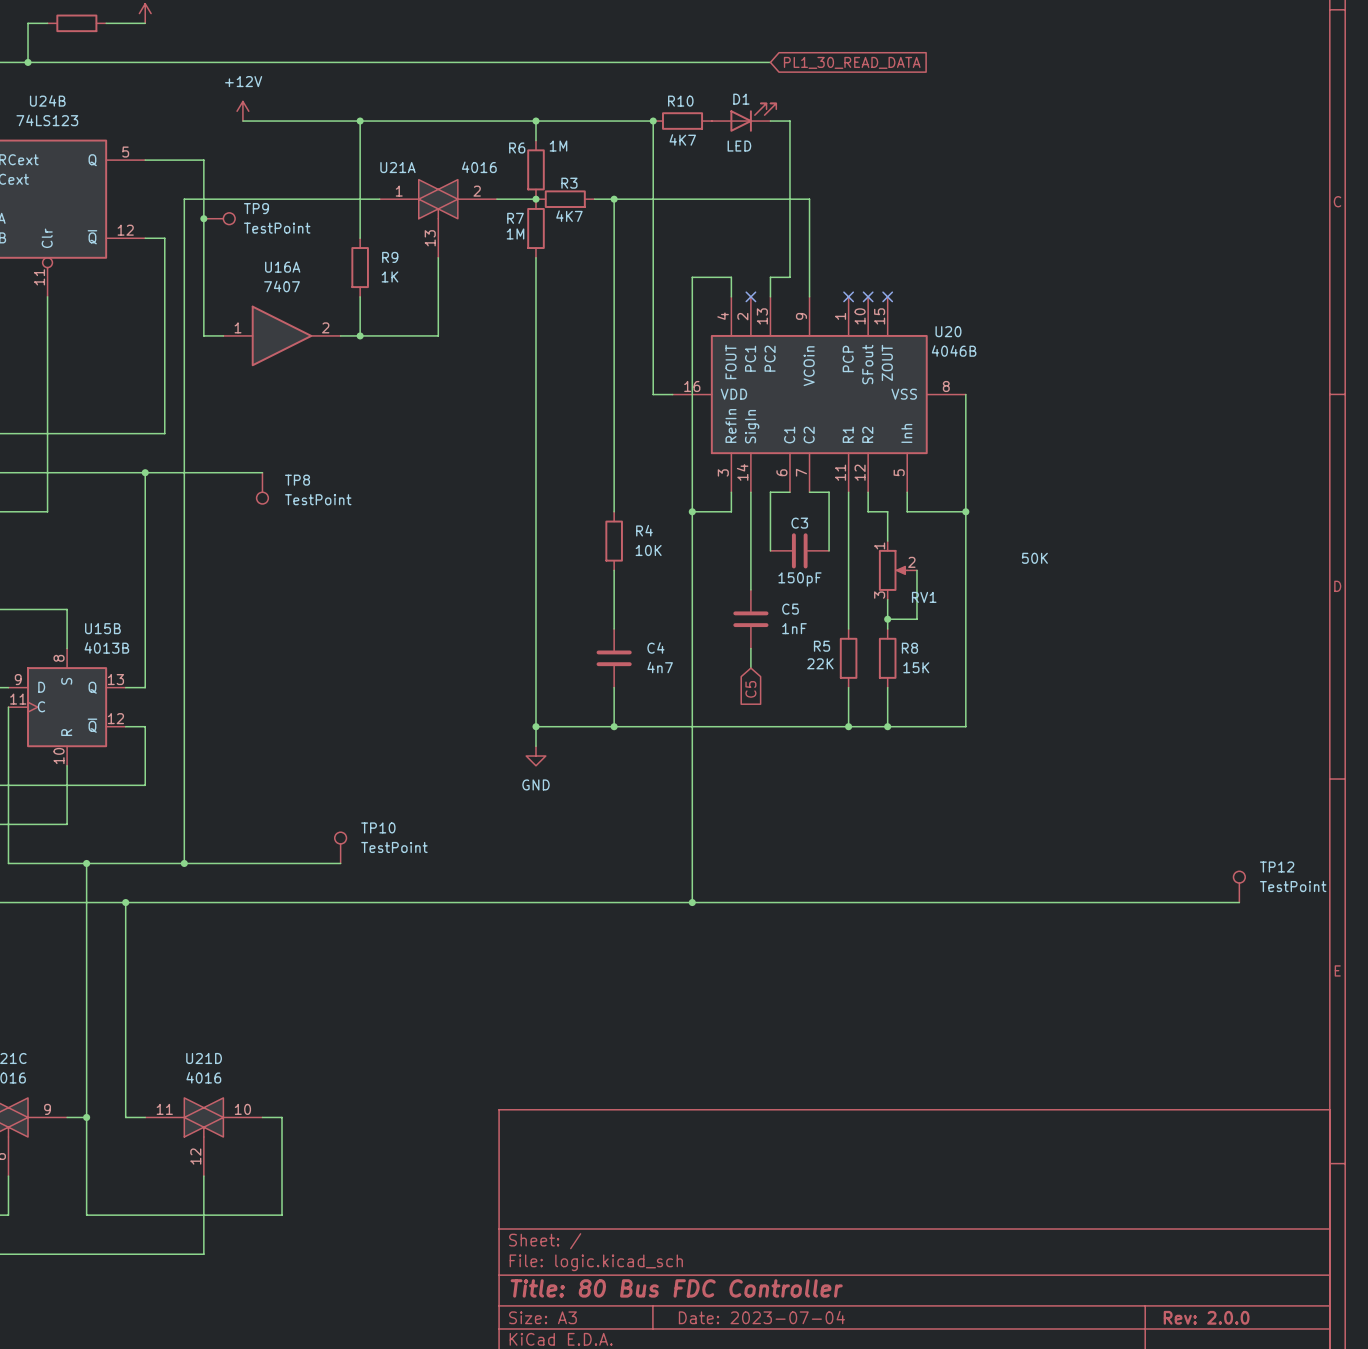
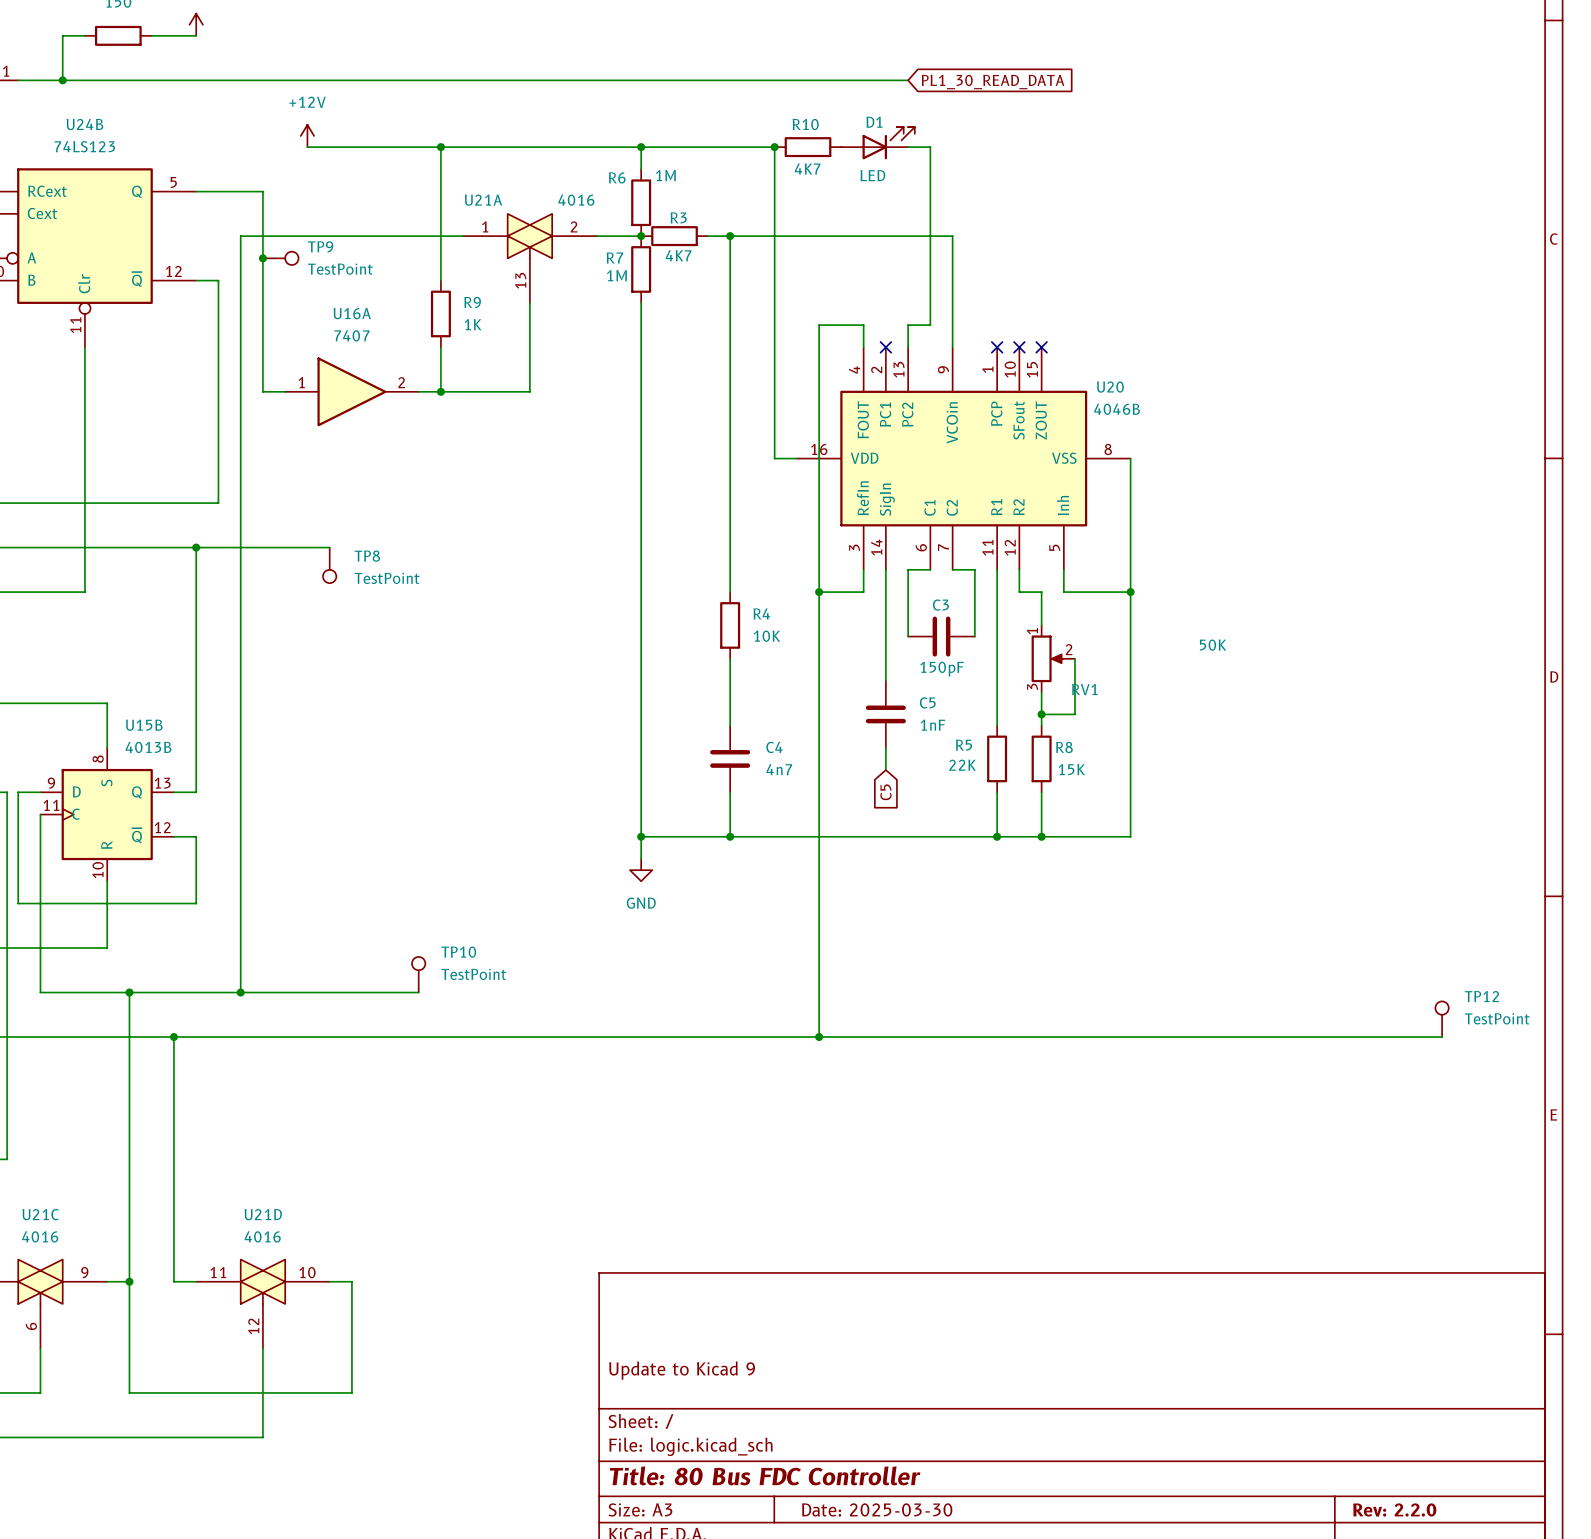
title block: none -> Update to Kicad 9 (682, 1370)
title block: Date: 2023-07-04 (761, 1317) -> Date: 2025-03-30 (877, 1509)
title block: Rev: 2.0.0 (1206, 1317) -> Rev: 2.2.0 (1394, 1510)

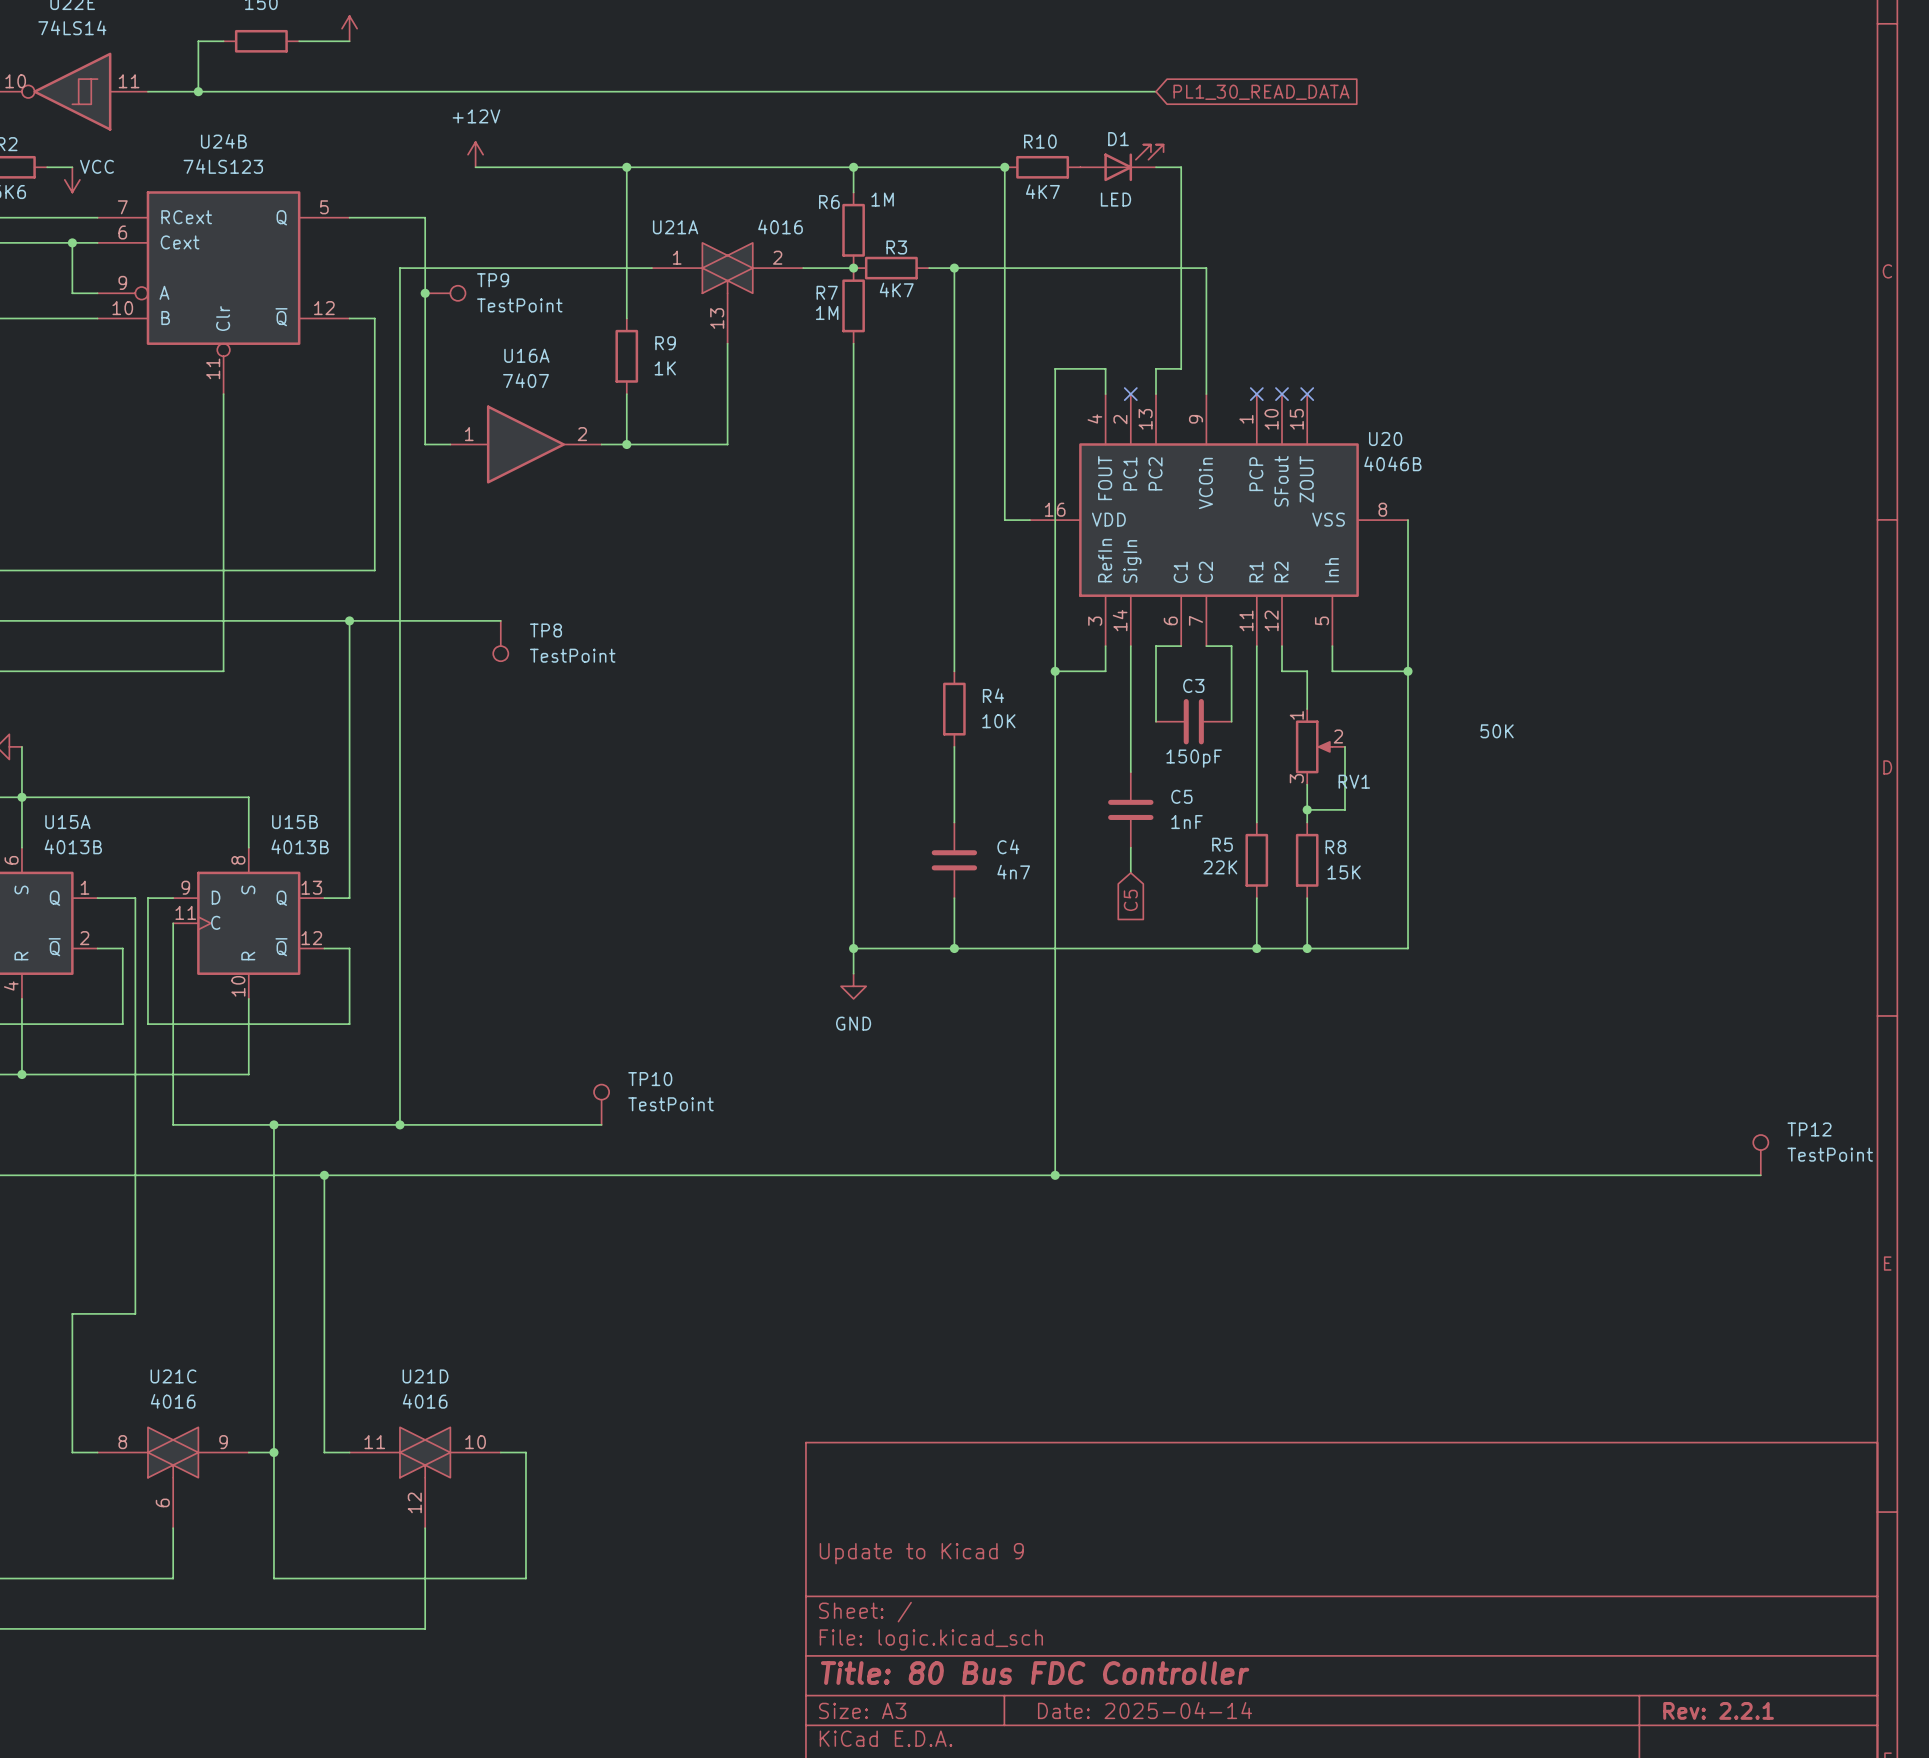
title block: Date: 2025-03-30 (877, 1509) -> Date: 2025-04-14 (1145, 1710)
title block: Rev: 2.2.0 (1394, 1510) -> Rev: 2.2.1 (1718, 1710)

